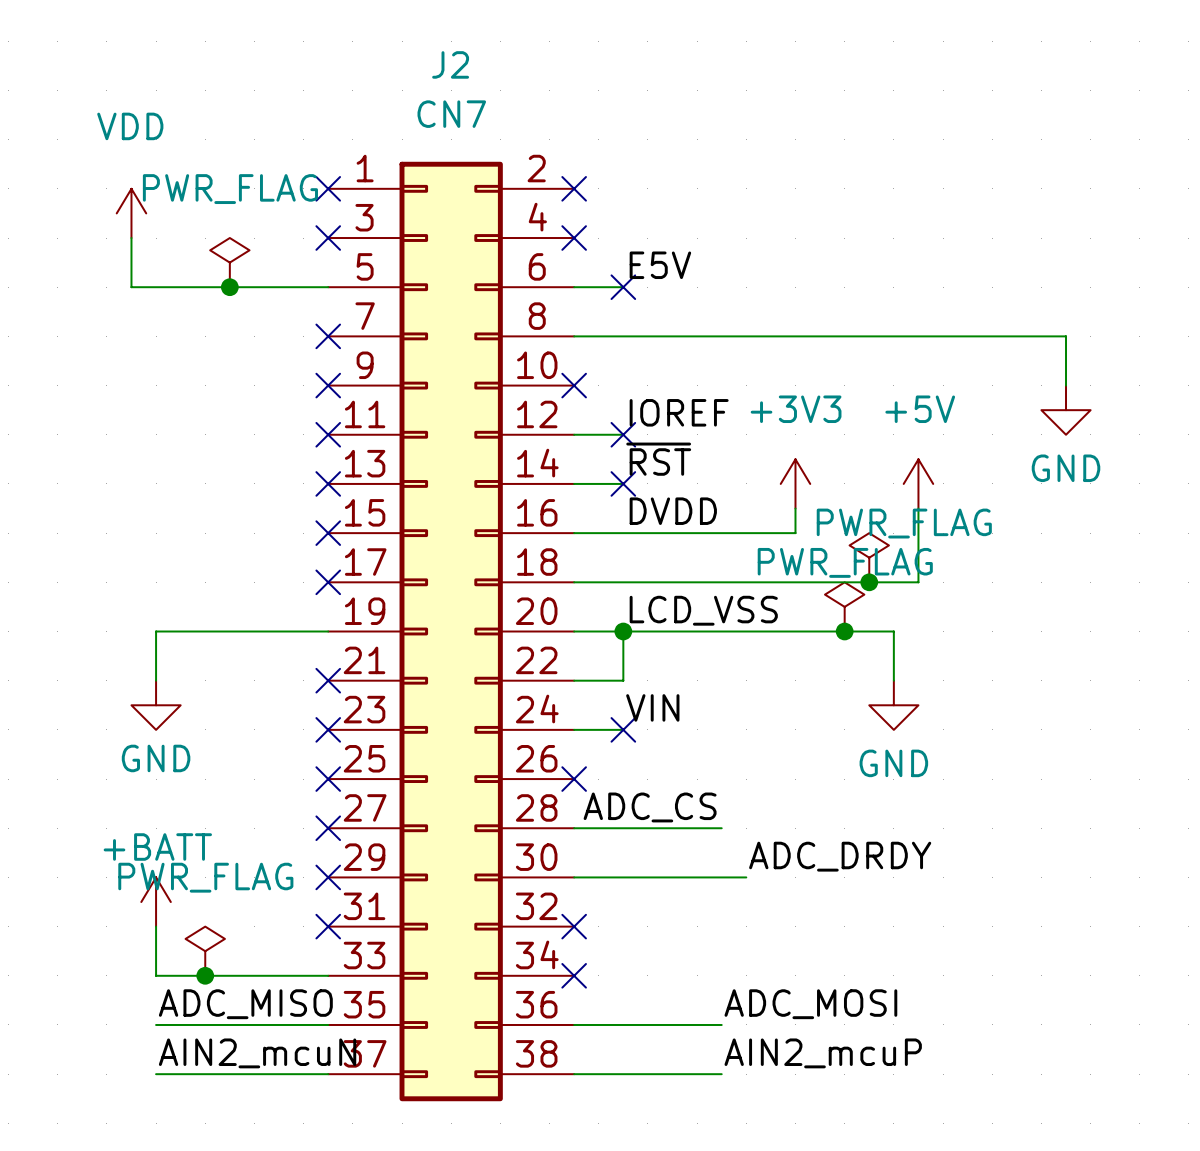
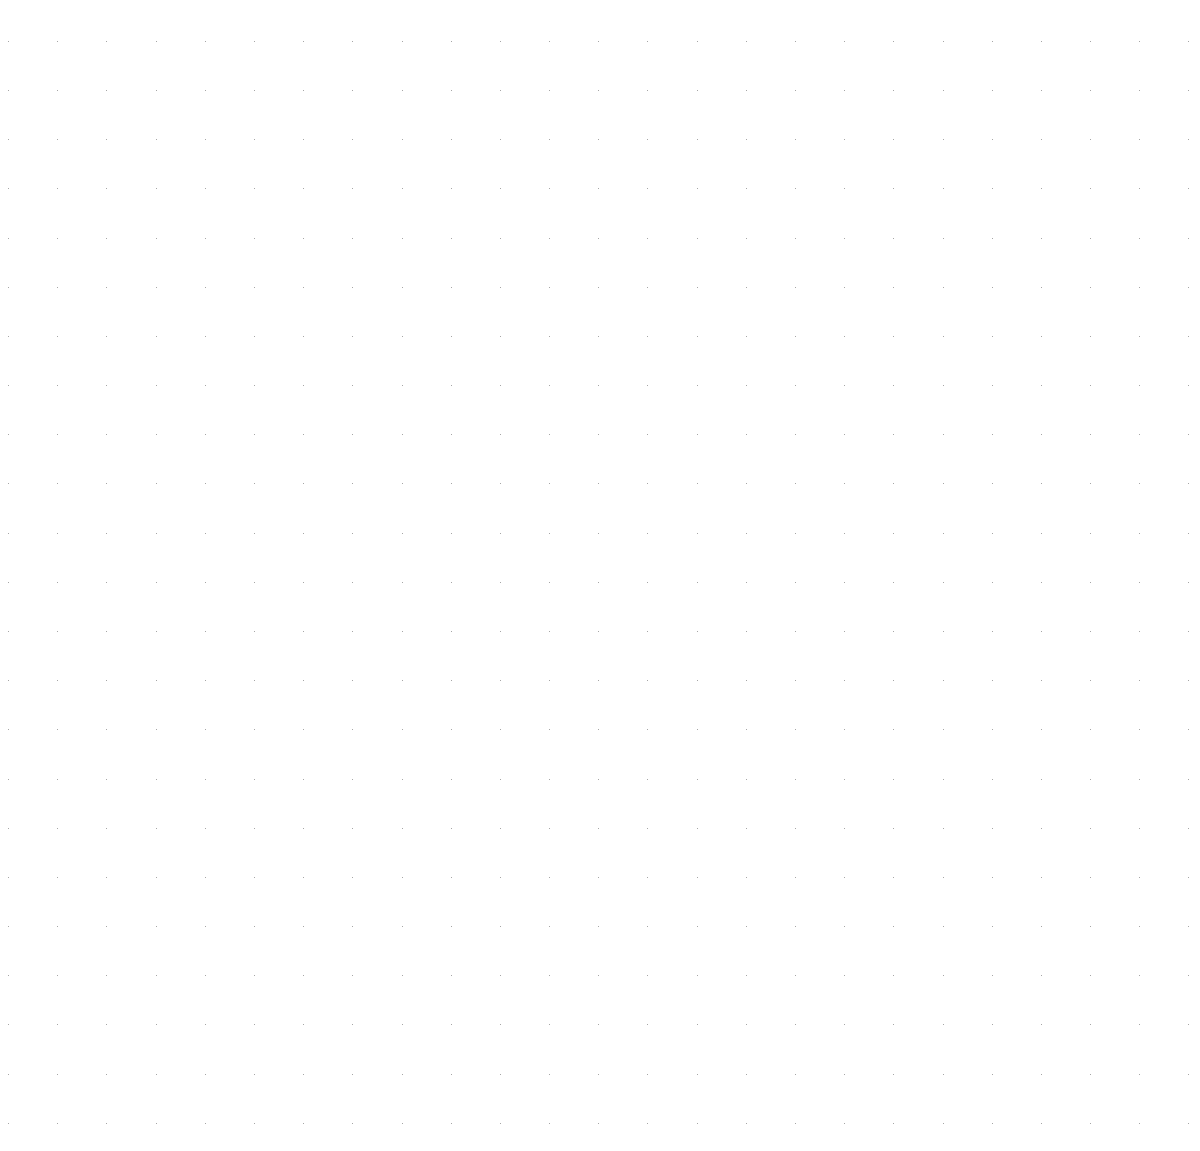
no-connect mark: (328, 188) -> none
no-connect mark: (574, 188) -> none
power symbol: VDD (131, 213) -> none
wire: (131, 238) (131, 287) (328, 287) -> none
no-connect mark: (328, 238) -> none
no-connect mark: (574, 238) -> none
power symbol: PWR_FLAG (229, 262) -> none
label: E5V (660, 265) -> none
junction: (229, 287) -> none
wire: (574, 287) (623, 287) -> none
no-connect mark: (623, 287) -> none
no-connect mark: (328, 336) -> none
wire: (574, 336) (1066, 336) (1066, 385) -> none
no-connect mark: (328, 385) -> none
no-connect mark: (574, 385) -> none
power symbol: GND (1066, 410) -> none
label: IOREF (679, 412) -> none
no-connect mark: (328, 434) -> none
wire: (574, 434) (623, 434) -> none
no-connect mark: (623, 434) -> none
label: ~{RST} (658, 459) -> none
no-connect mark: (328, 483) -> none
wire: (574, 483) (623, 483) -> none
no-connect mark: (623, 483) -> none
power symbol: +3V3 (795, 483) -> none
power symbol: +5V (918, 483) -> none
wire: (795, 508) (795, 533) (574, 533) -> none
wire: (918, 508) (918, 582) (574, 582) -> none
label: DVDD (673, 511) -> none
no-connect mark: (328, 533) -> none
power symbol: PWR_FLAG (869, 557) -> none
no-connect mark: (328, 582) -> none
junction: (869, 582) -> none
power symbol: PWR_FLAG (844, 606) -> none
label: LCD_VSS (703, 610) -> none
wire: (328, 631) (156, 631) (156, 680) -> none
J2: CN7 (451, 631) -> none
wire: (574, 631) (893, 631) (893, 680) -> none
wire: (623, 631) (623, 680) (574, 680) -> none
junction: (623, 631) -> none
junction: (844, 631) -> none
no-connect mark: (328, 680) -> none
power symbol: GND (156, 705) -> none
power symbol: GND (893, 705) -> none
label: VIN (652, 707) -> none
no-connect mark: (328, 729) -> none
wire: (574, 729) (623, 729) -> none
no-connect mark: (623, 729) -> none
no-connect mark: (328, 779) -> none
no-connect mark: (574, 779) -> none
label: ADC_CS (650, 807) -> none
no-connect mark: (328, 828) -> none
wire: (574, 828) (721, 828) -> none
label: ADC_DRDY (840, 856) -> none
no-connect mark: (328, 877) -> none
wire: (574, 877) (746, 877) -> none
power symbol: +BATT (156, 902) -> none
wire: (156, 926) (156, 975) (328, 975) -> none
no-connect mark: (328, 926) -> none
no-connect mark: (574, 926) -> none
power symbol: PWR_FLAG (205, 951) -> none
junction: (205, 975) -> none
no-connect mark: (574, 975) -> none
label: ADC_MISO (245, 1004) -> none
label: ADC_MOSI (810, 1004) -> none
wire: (156, 1024) (328, 1024) -> none
wire: (574, 1024) (721, 1024) -> none
label: AIN2_mcuN (257, 1053) -> none
label: AIN2_mcuP (823, 1053) -> none
wire: (156, 1074) (328, 1074) -> none
wire: (574, 1074) (721, 1074) -> none

